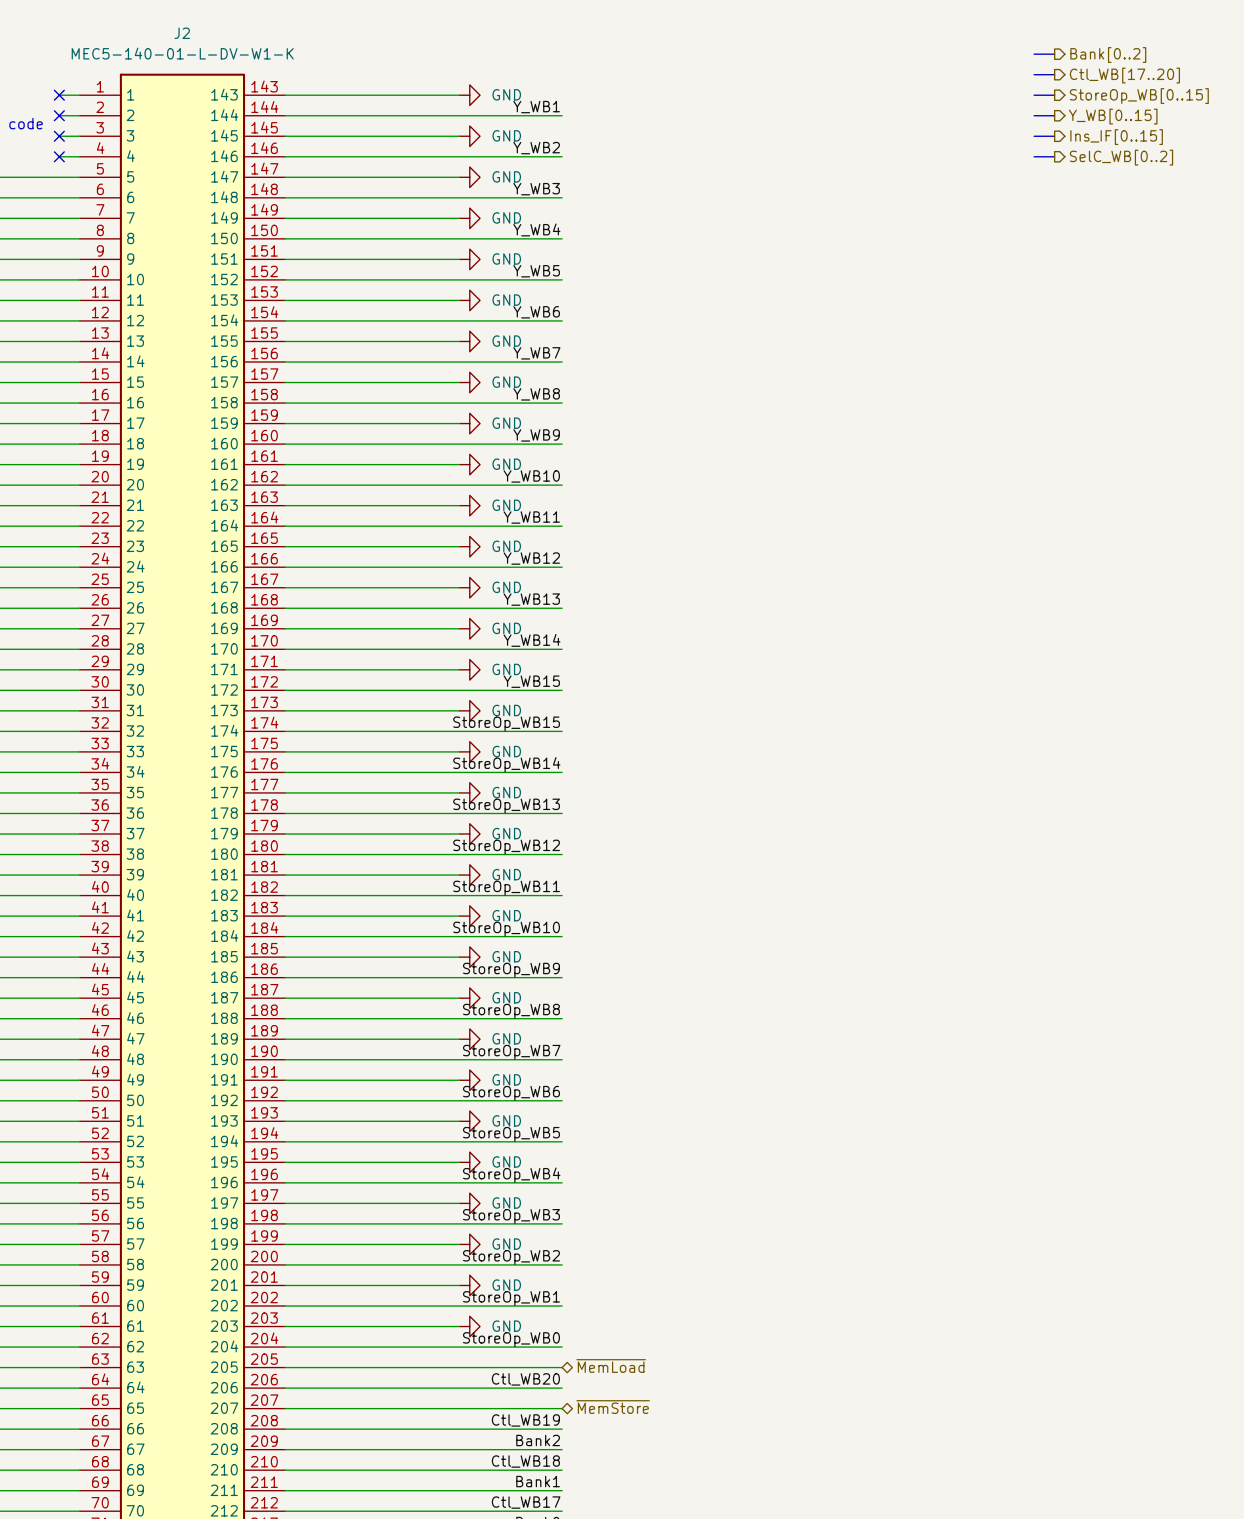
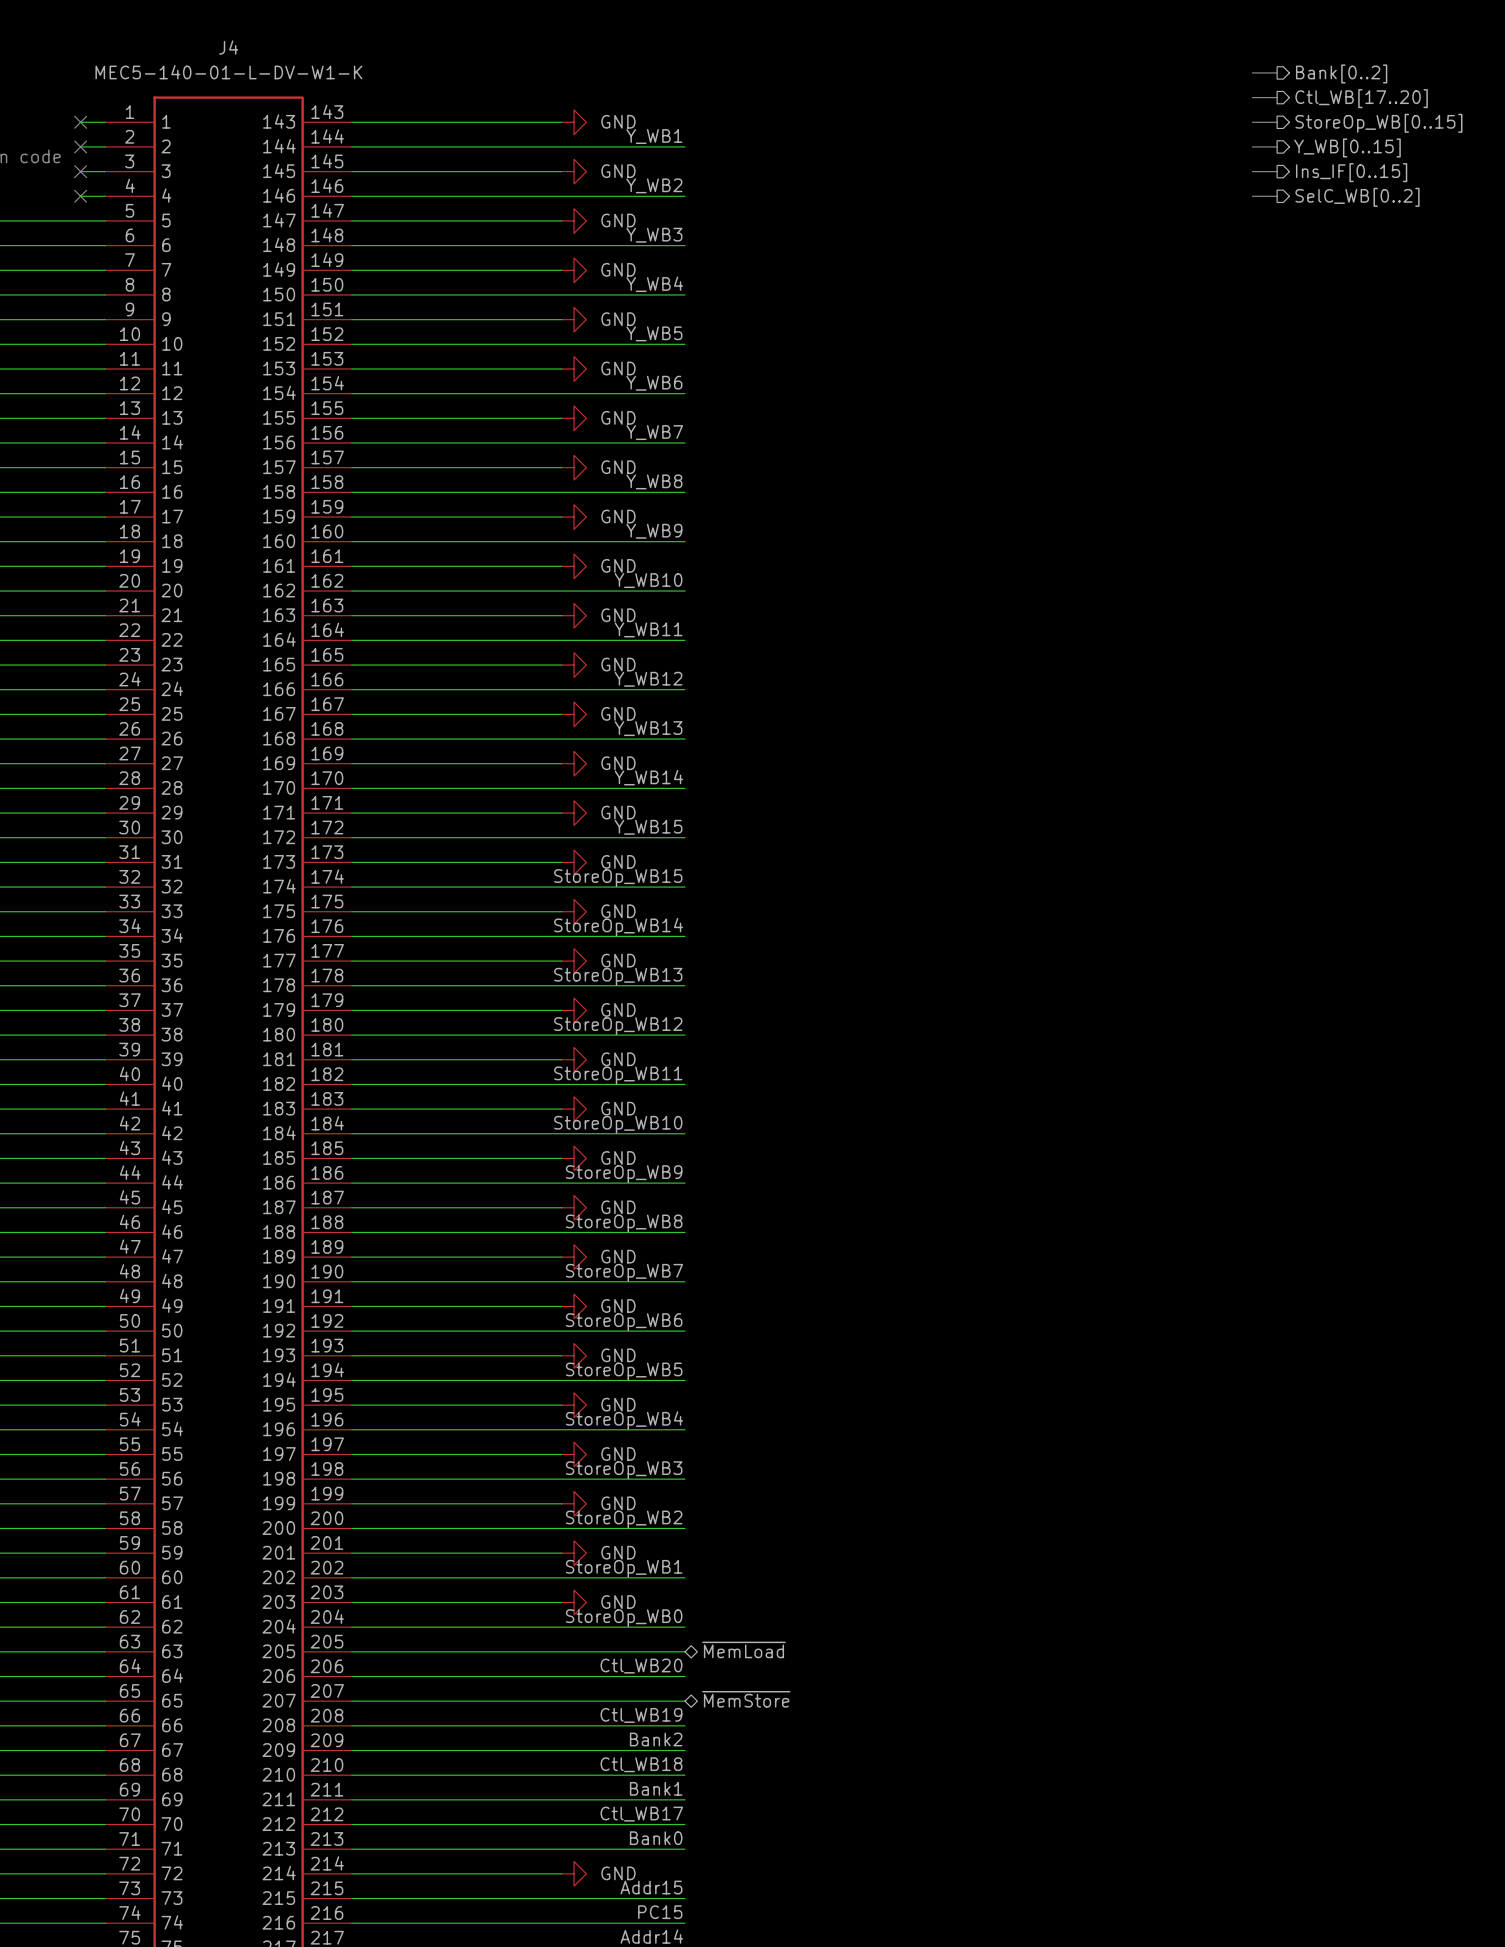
J2 name: J2 (182, 33) -> J4 (228, 47)

